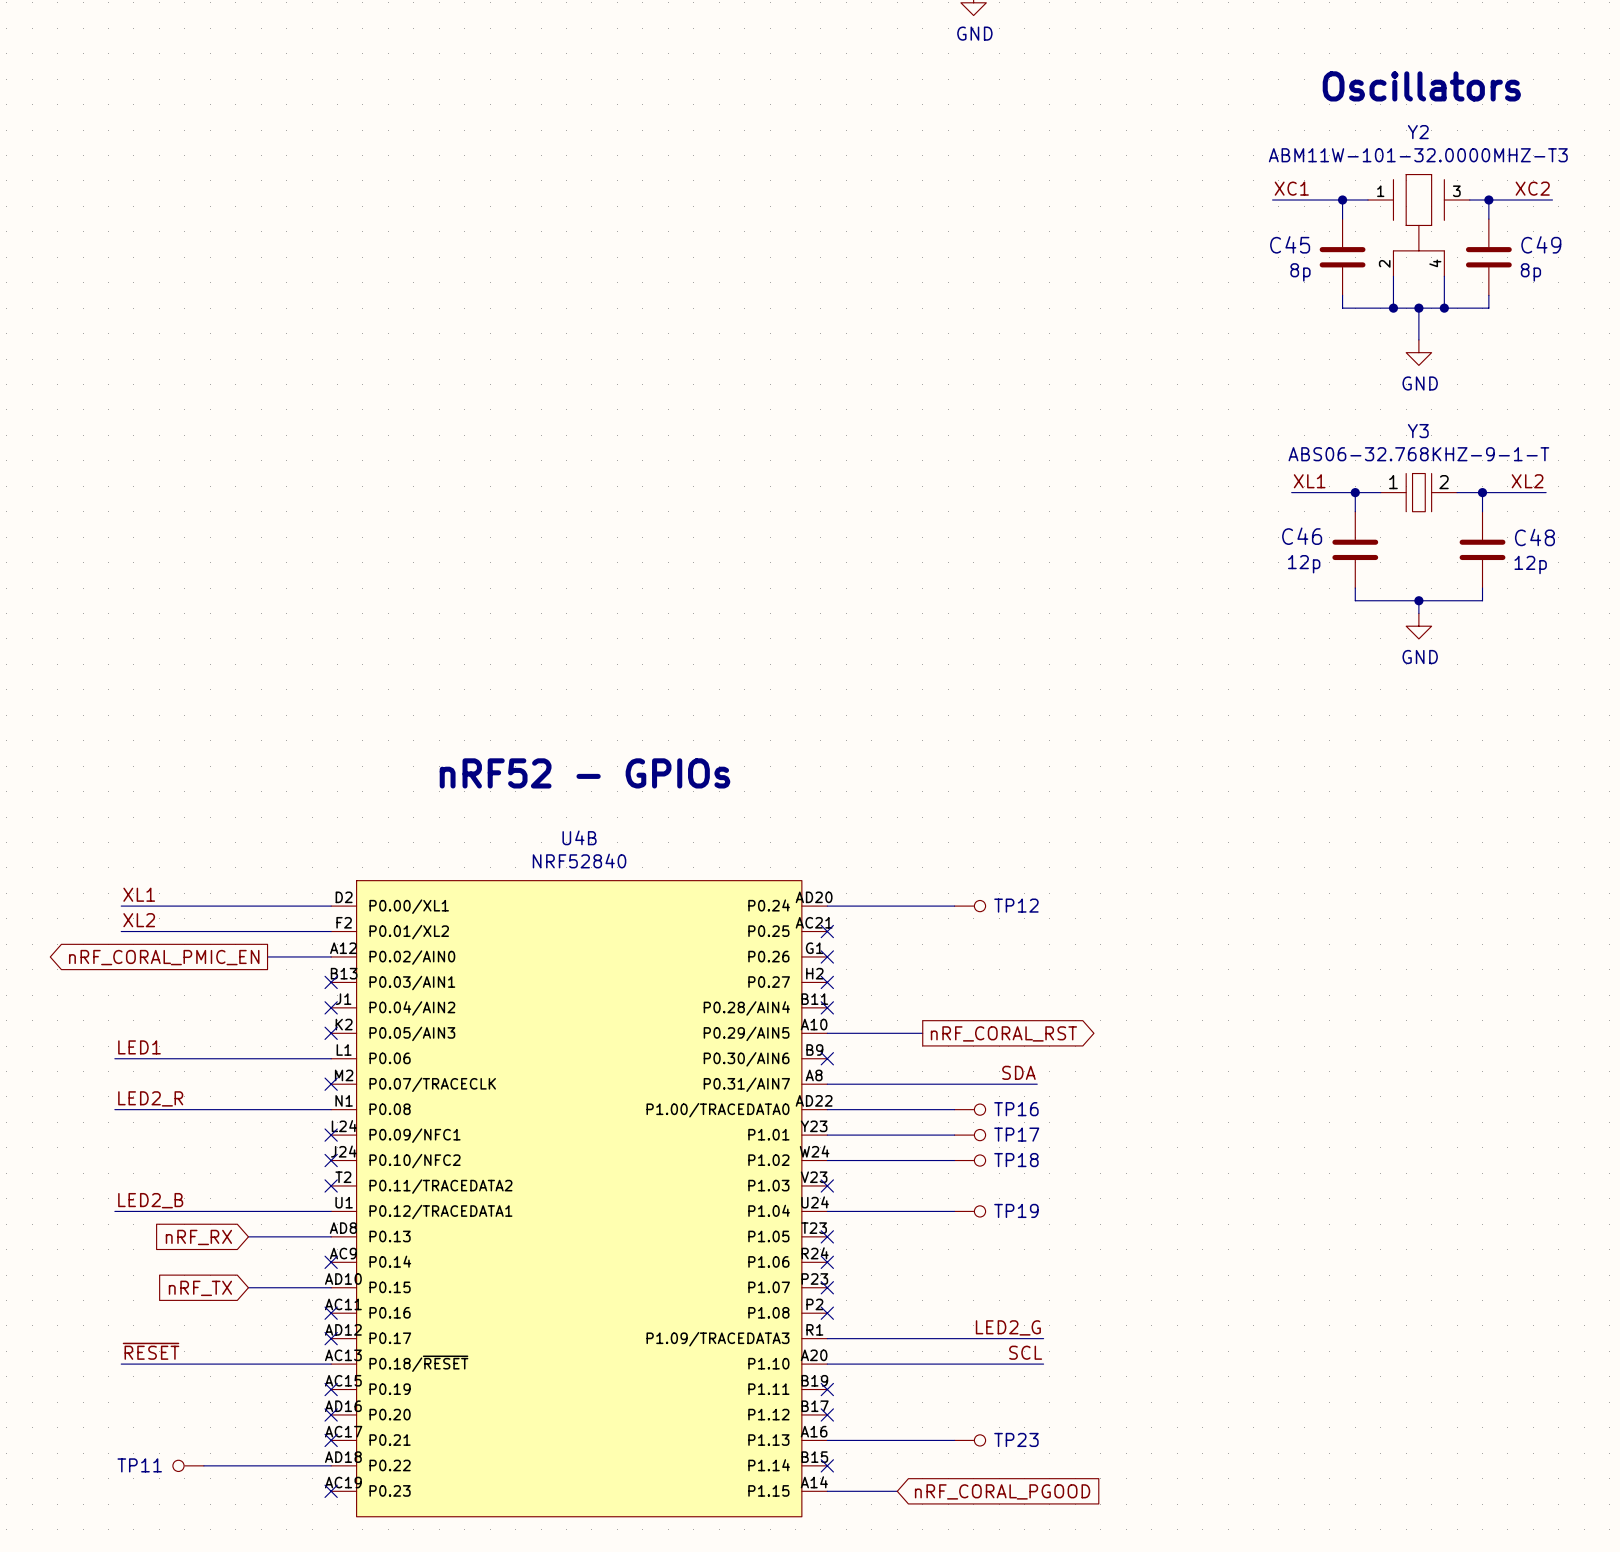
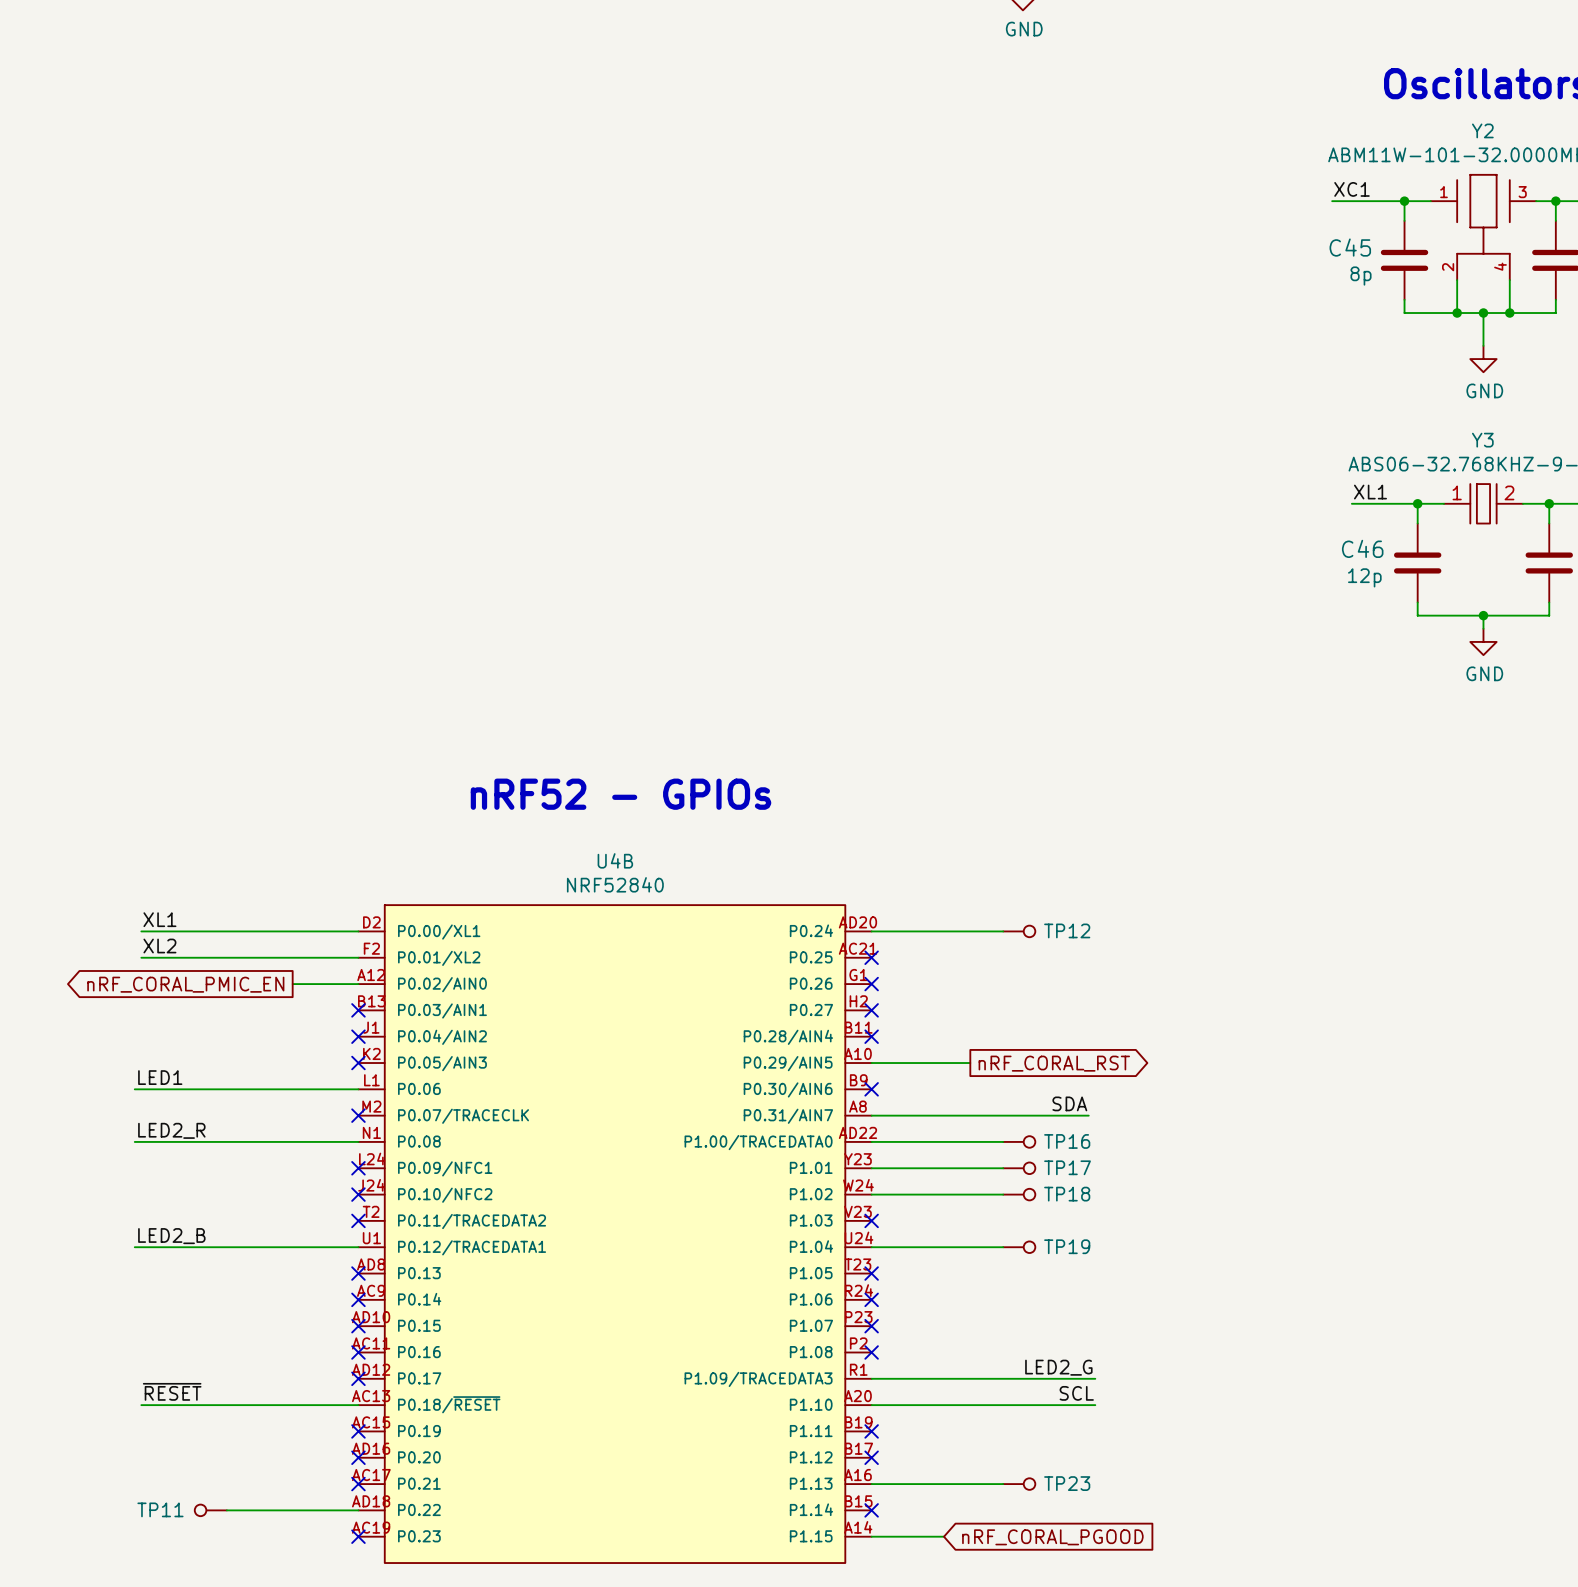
wire: (248, 1236) (331, 1236) -> none
no-connect mark: none -> (358, 1273)
global label: nRF_RX (198, 1237) -> none
wire: (248, 1287) (331, 1287) -> none
no-connect mark: none -> (358, 1326)
global label: nRF_TX (200, 1288) -> none

